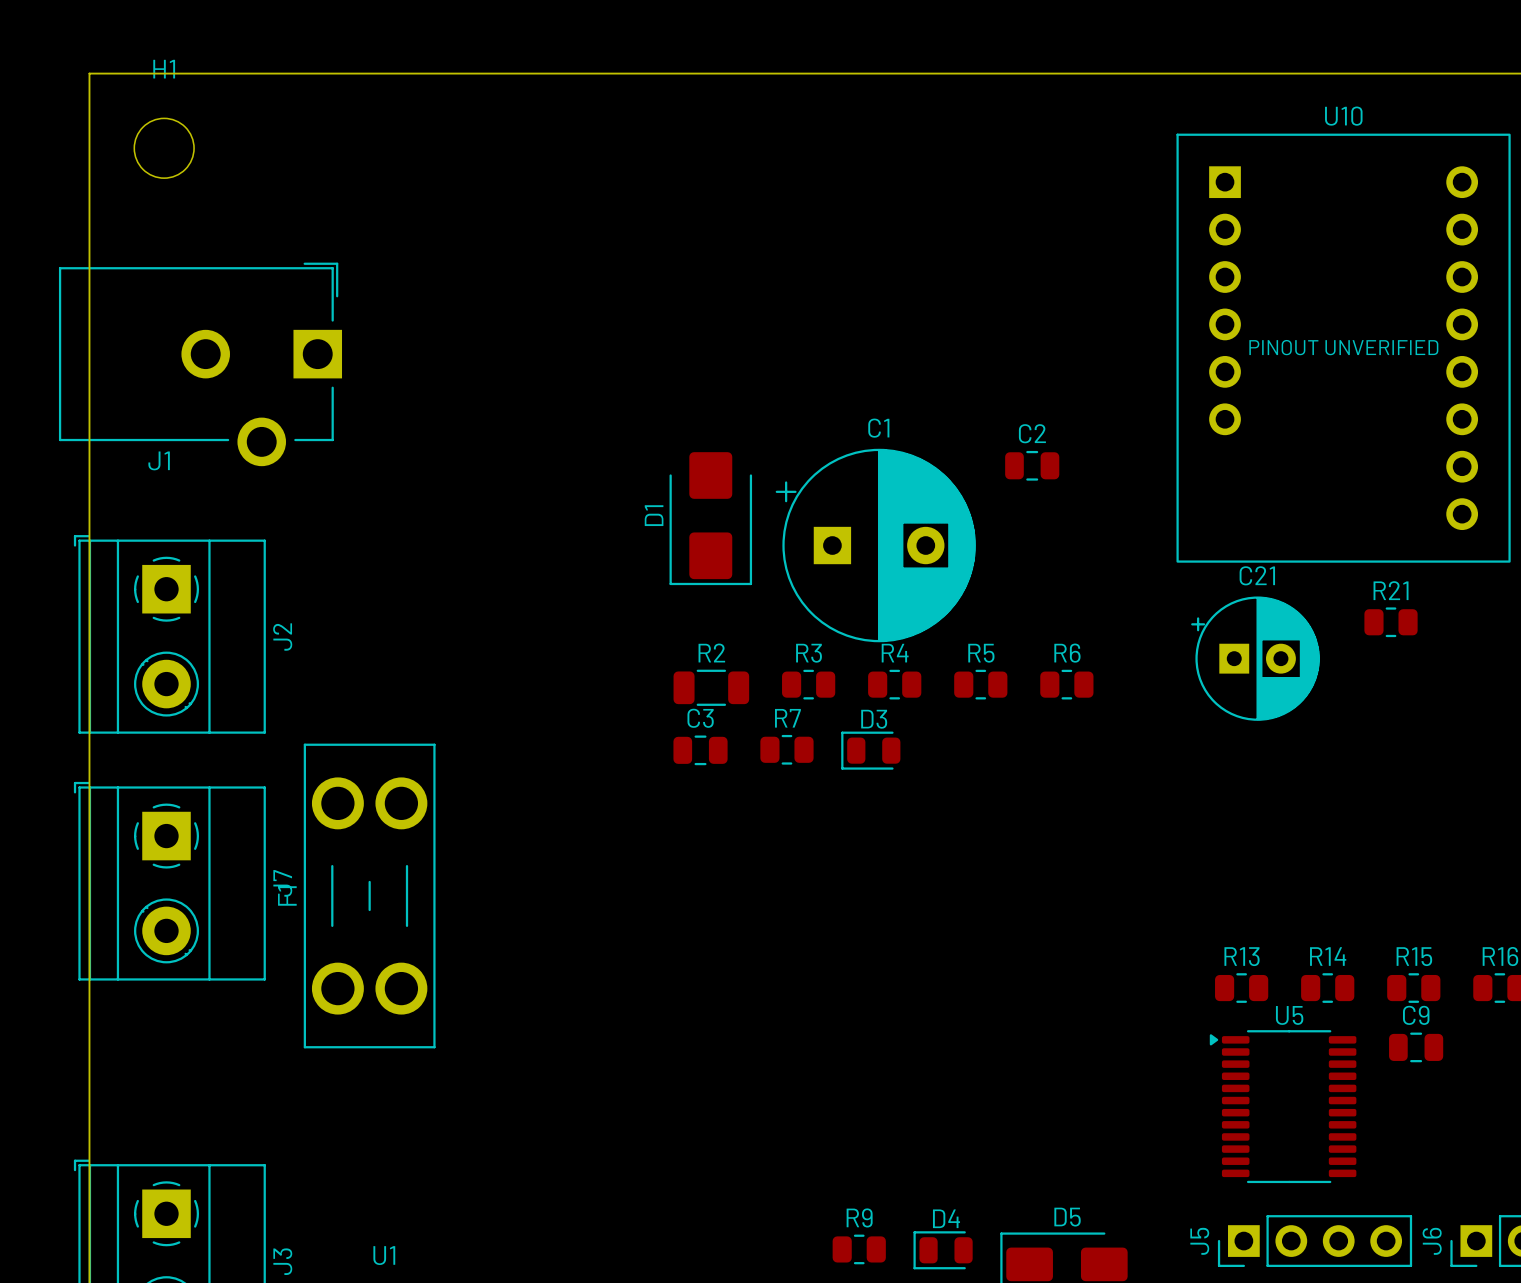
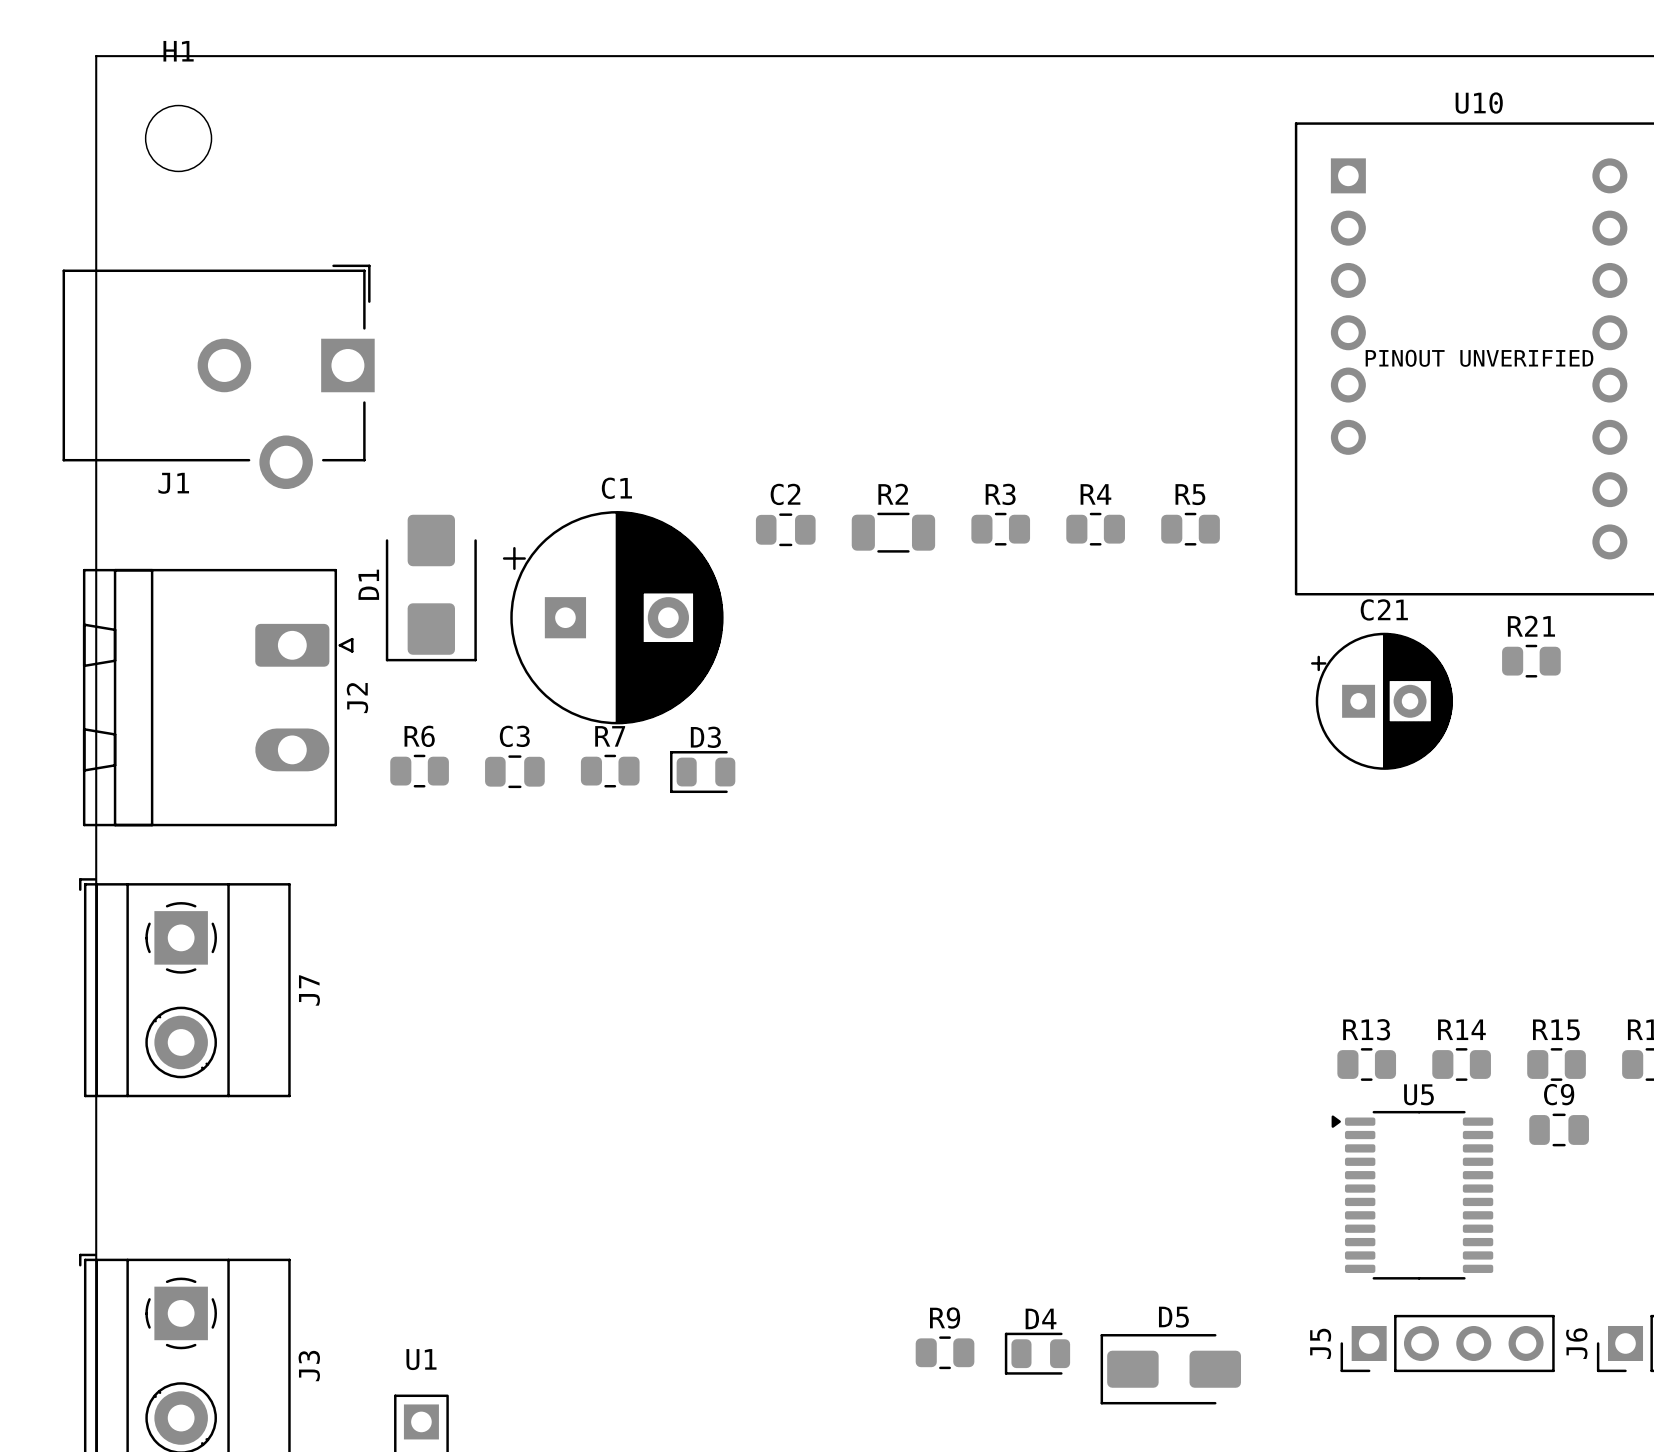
C2 position: (1032, 465) -> (785, 529)
D1 position: (710, 518) -> (431, 588)
J2 footprint: [73, 535, 266, 734] -> [82, 568, 354, 827]
C1 position: (875, 545) -> (613, 617)
R3 position: (808, 684) -> (1000, 529)
R4 position: (894, 684) -> (1095, 529)
R5 position: (980, 684) -> (1190, 529)
R6 position: (1066, 684) -> (419, 771)
R2 position: (711, 687) -> (893, 532)
R7 position: (786, 749) -> (610, 771)
C3 position: (700, 750) -> (514, 771)
D3 position: (870, 750) -> (702, 772)
J7 position: (169, 881) -> (184, 987)
F1: (369, 895) -> none

